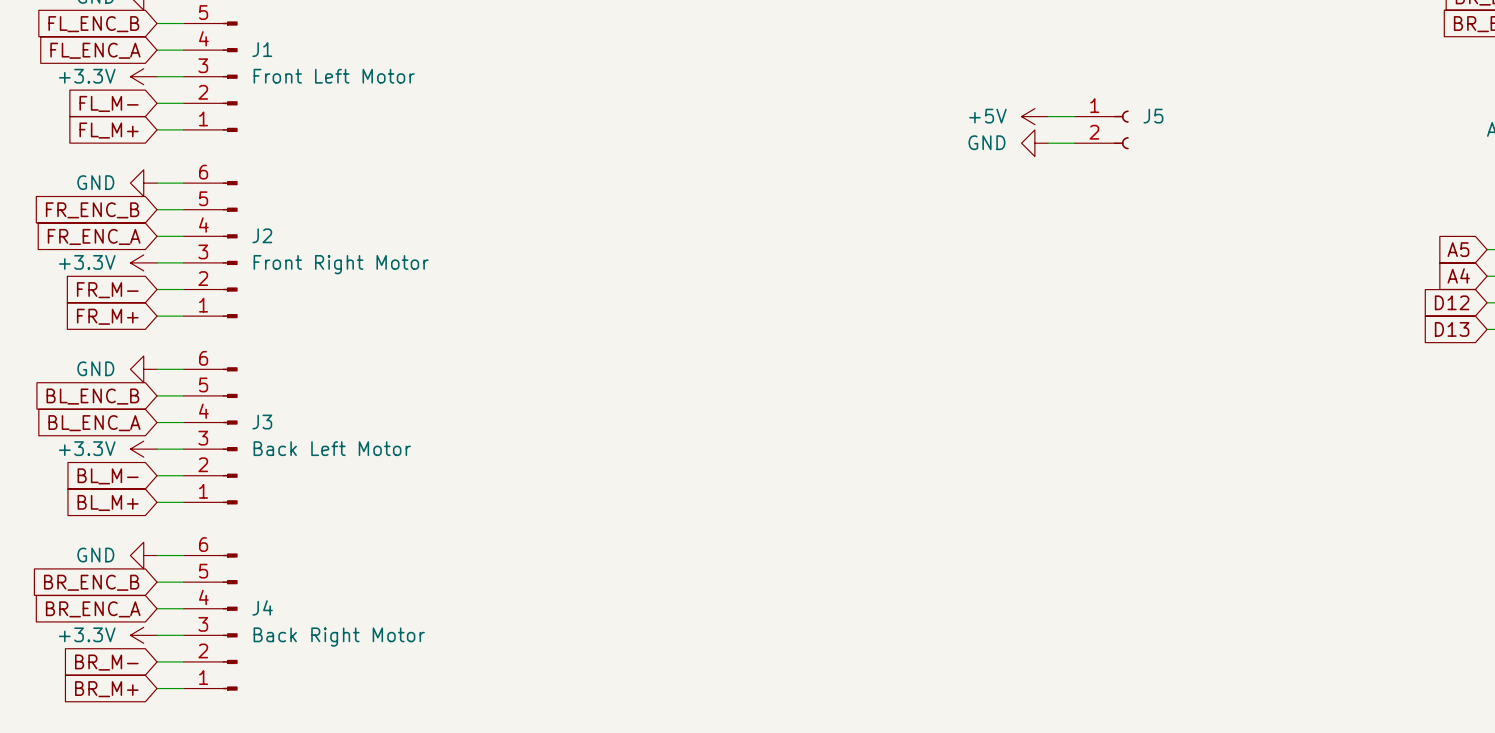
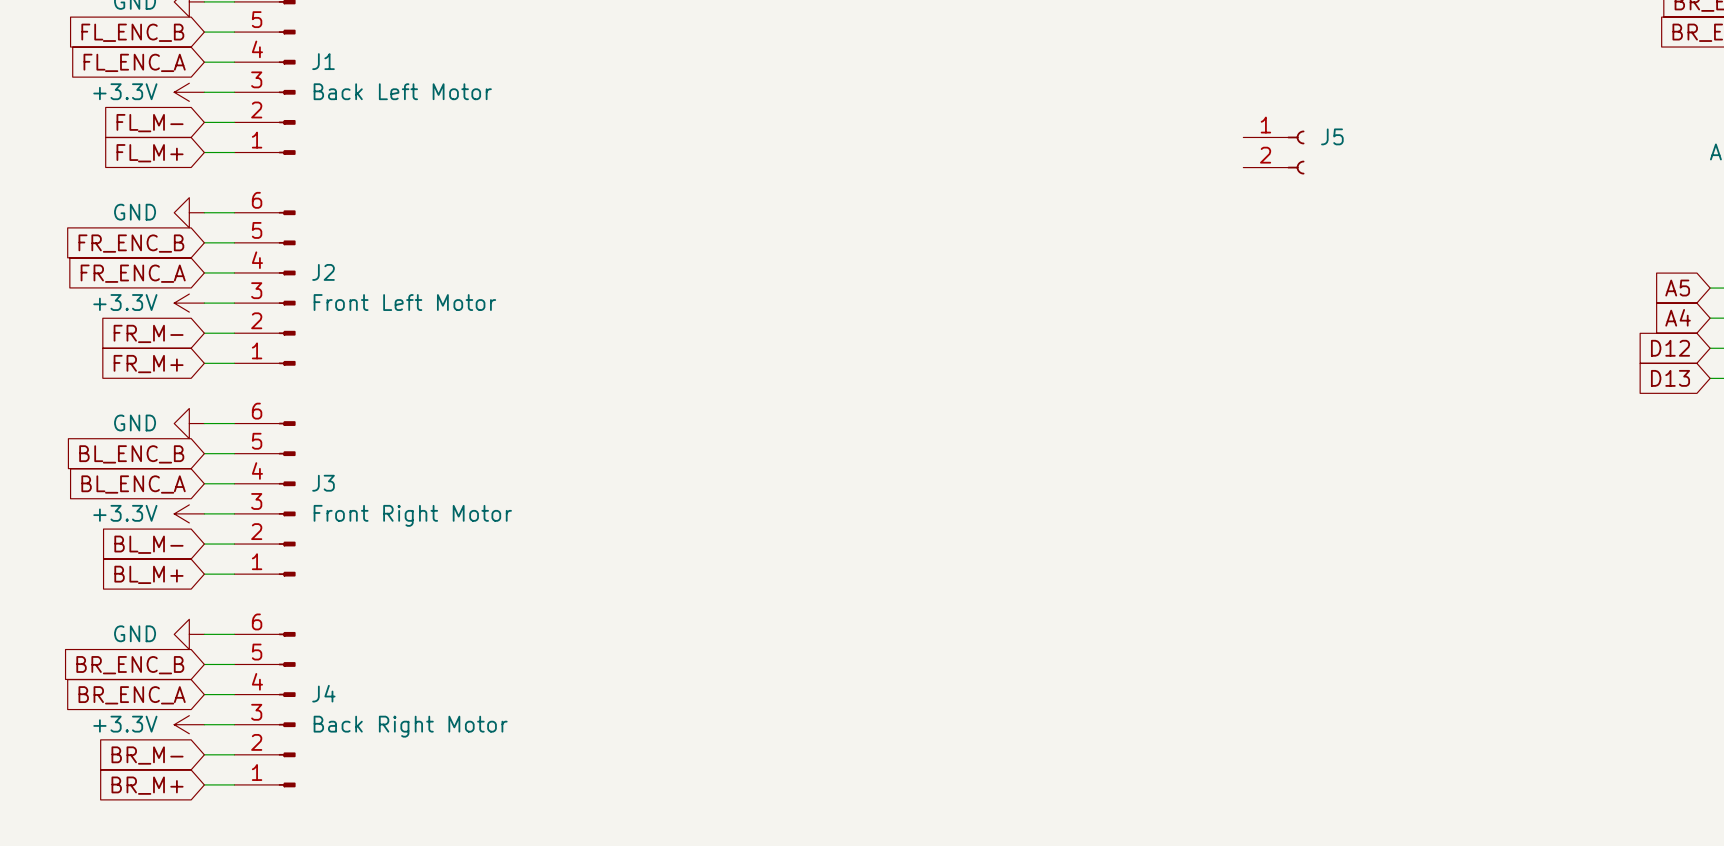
J1 value: Front Left Motor (334, 76) -> Back Left Motor (402, 91)
power symbol: +5V (1034, 116) -> none
wire: (1048, 116) (1074, 116) -> none
power symbol: GND (1034, 143) -> none
wire: (1048, 143) (1074, 143) -> none
J2 value: Front Right Motor (341, 264) -> Front Left Motor (404, 302)
J3 value: Back Left Motor (332, 448) -> Front Right Motor (412, 515)

